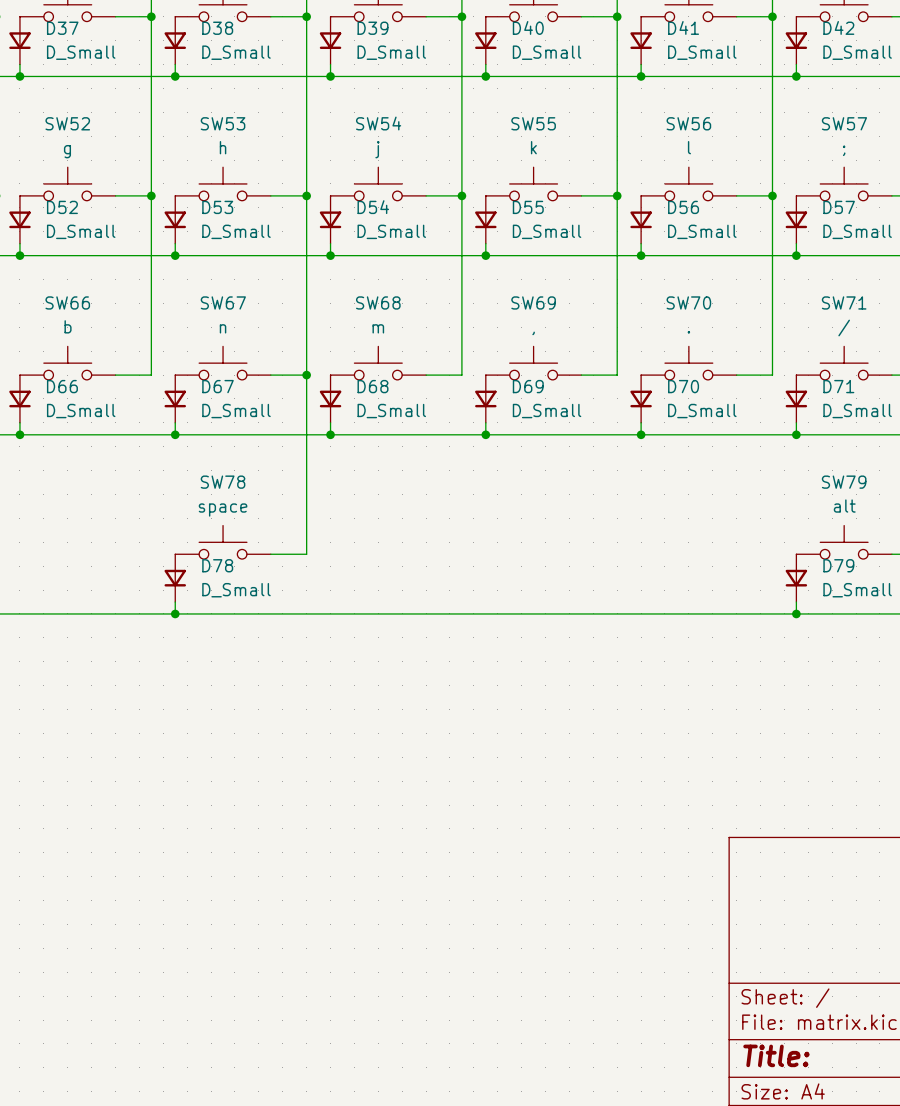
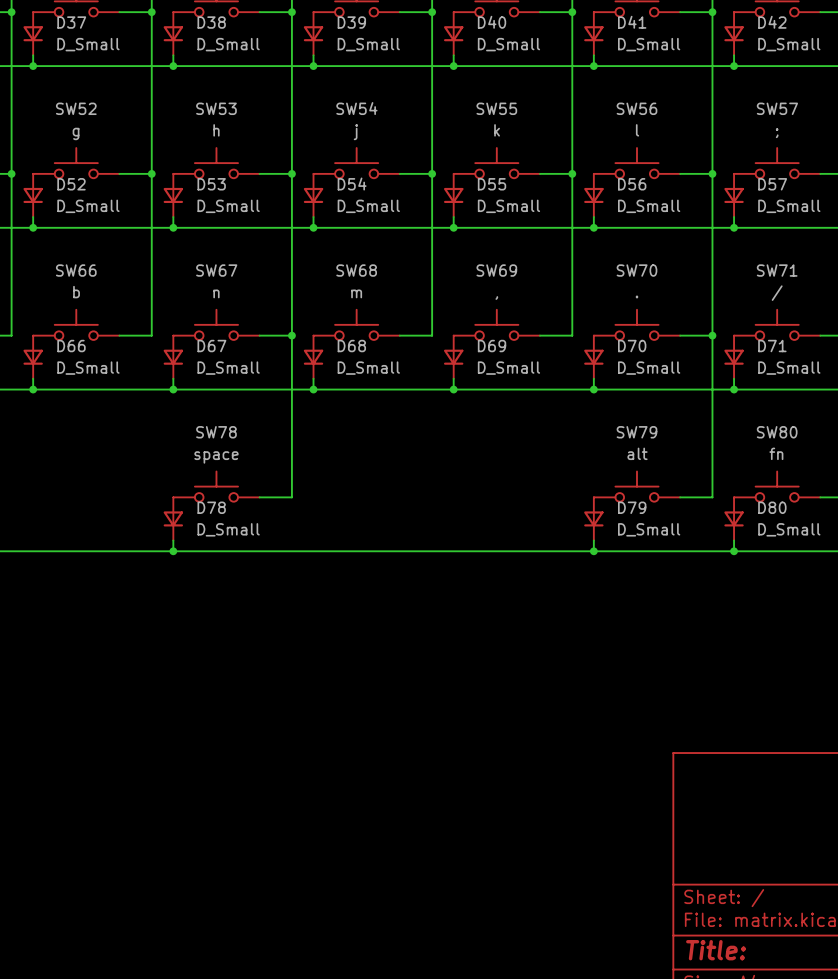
wire: none -> (712, 335) (712, 497) (680, 497)
junction: none -> (712, 335)
SW79 name: SW79 (844, 482) -> SW80 (777, 432)
SW79 value: alt (844, 506) -> fn (776, 453)
SW79: none -> alt (636, 486)
D79 name: D79 (838, 565) -> D80 (772, 507)
D79: none -> D_Small (593, 518)
wire: none -> (593, 540) (593, 551)
junction: none -> (593, 551)

